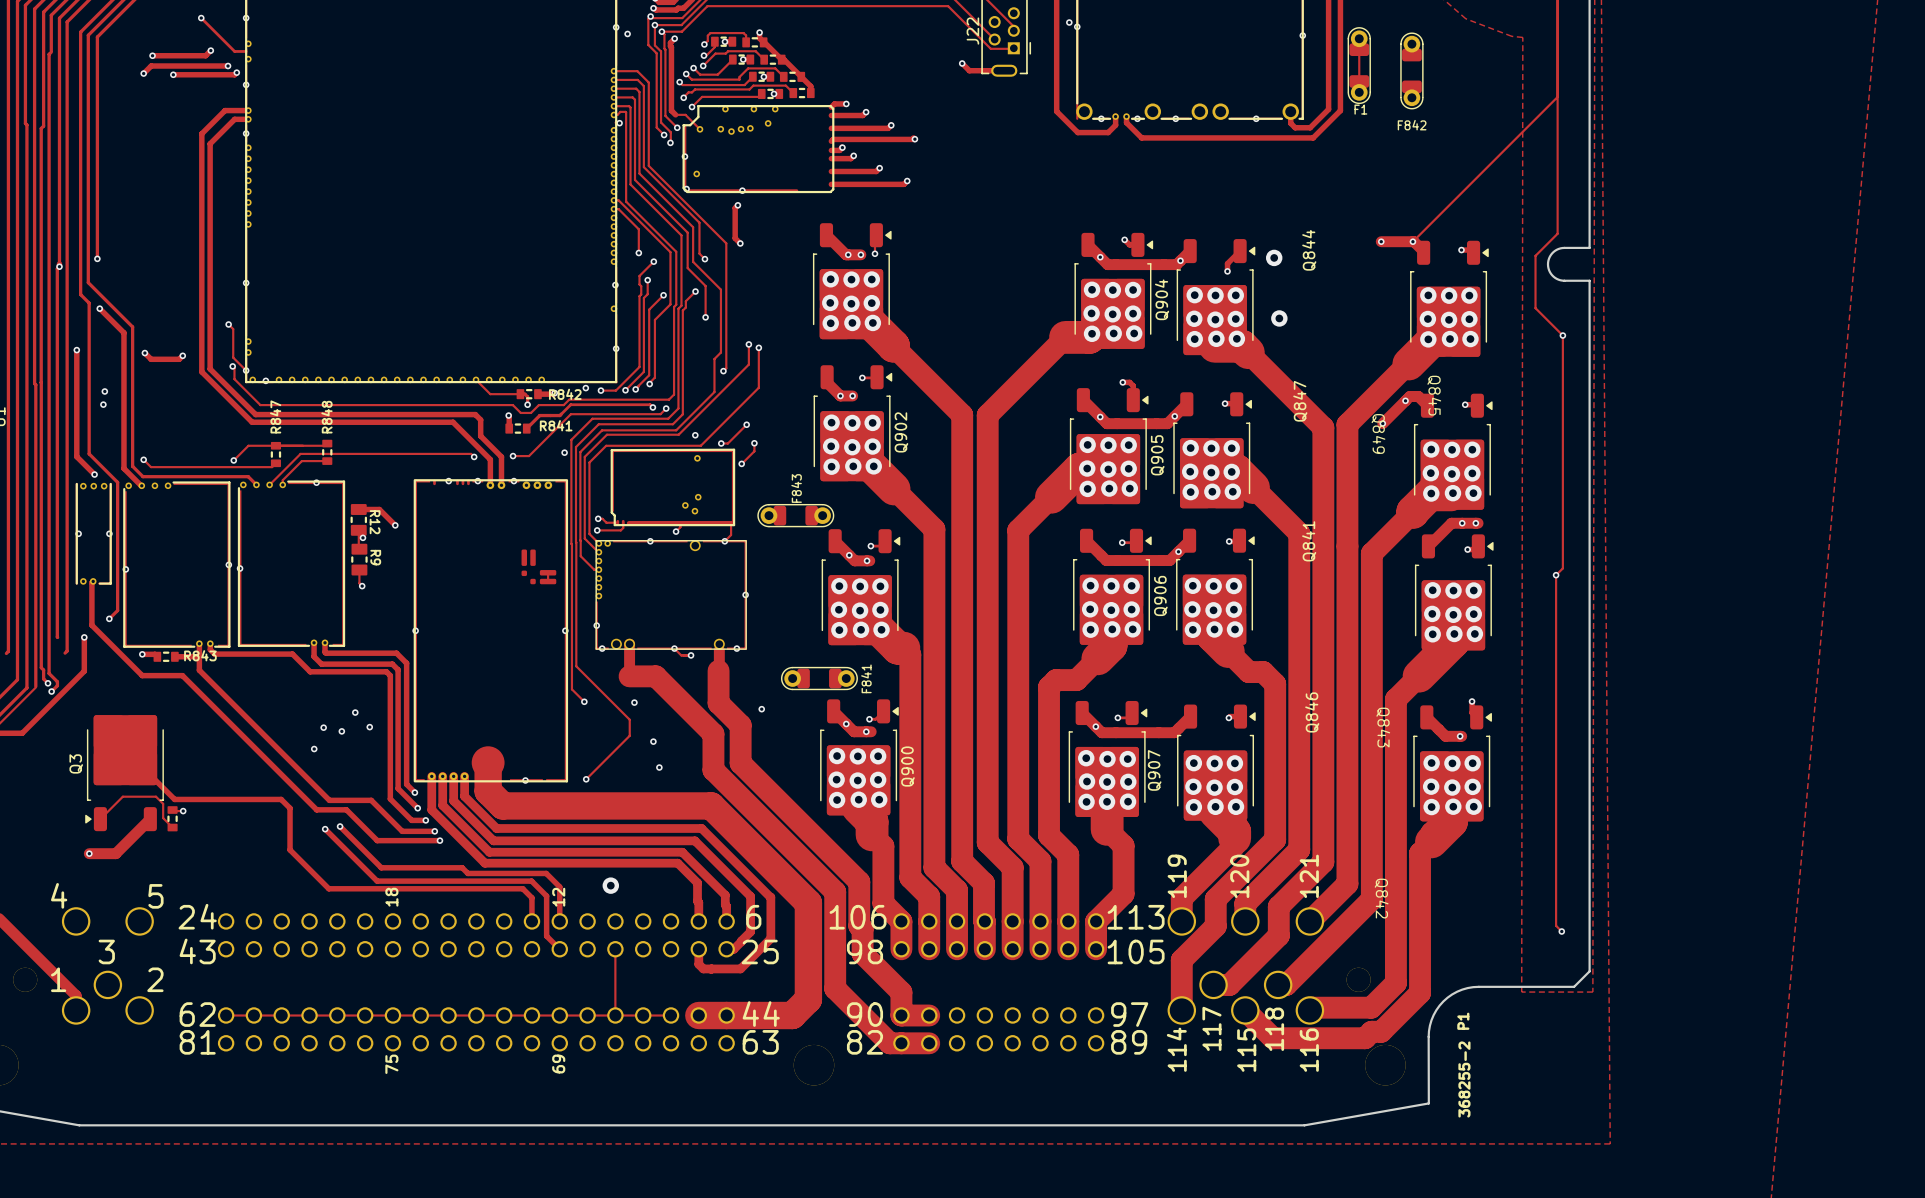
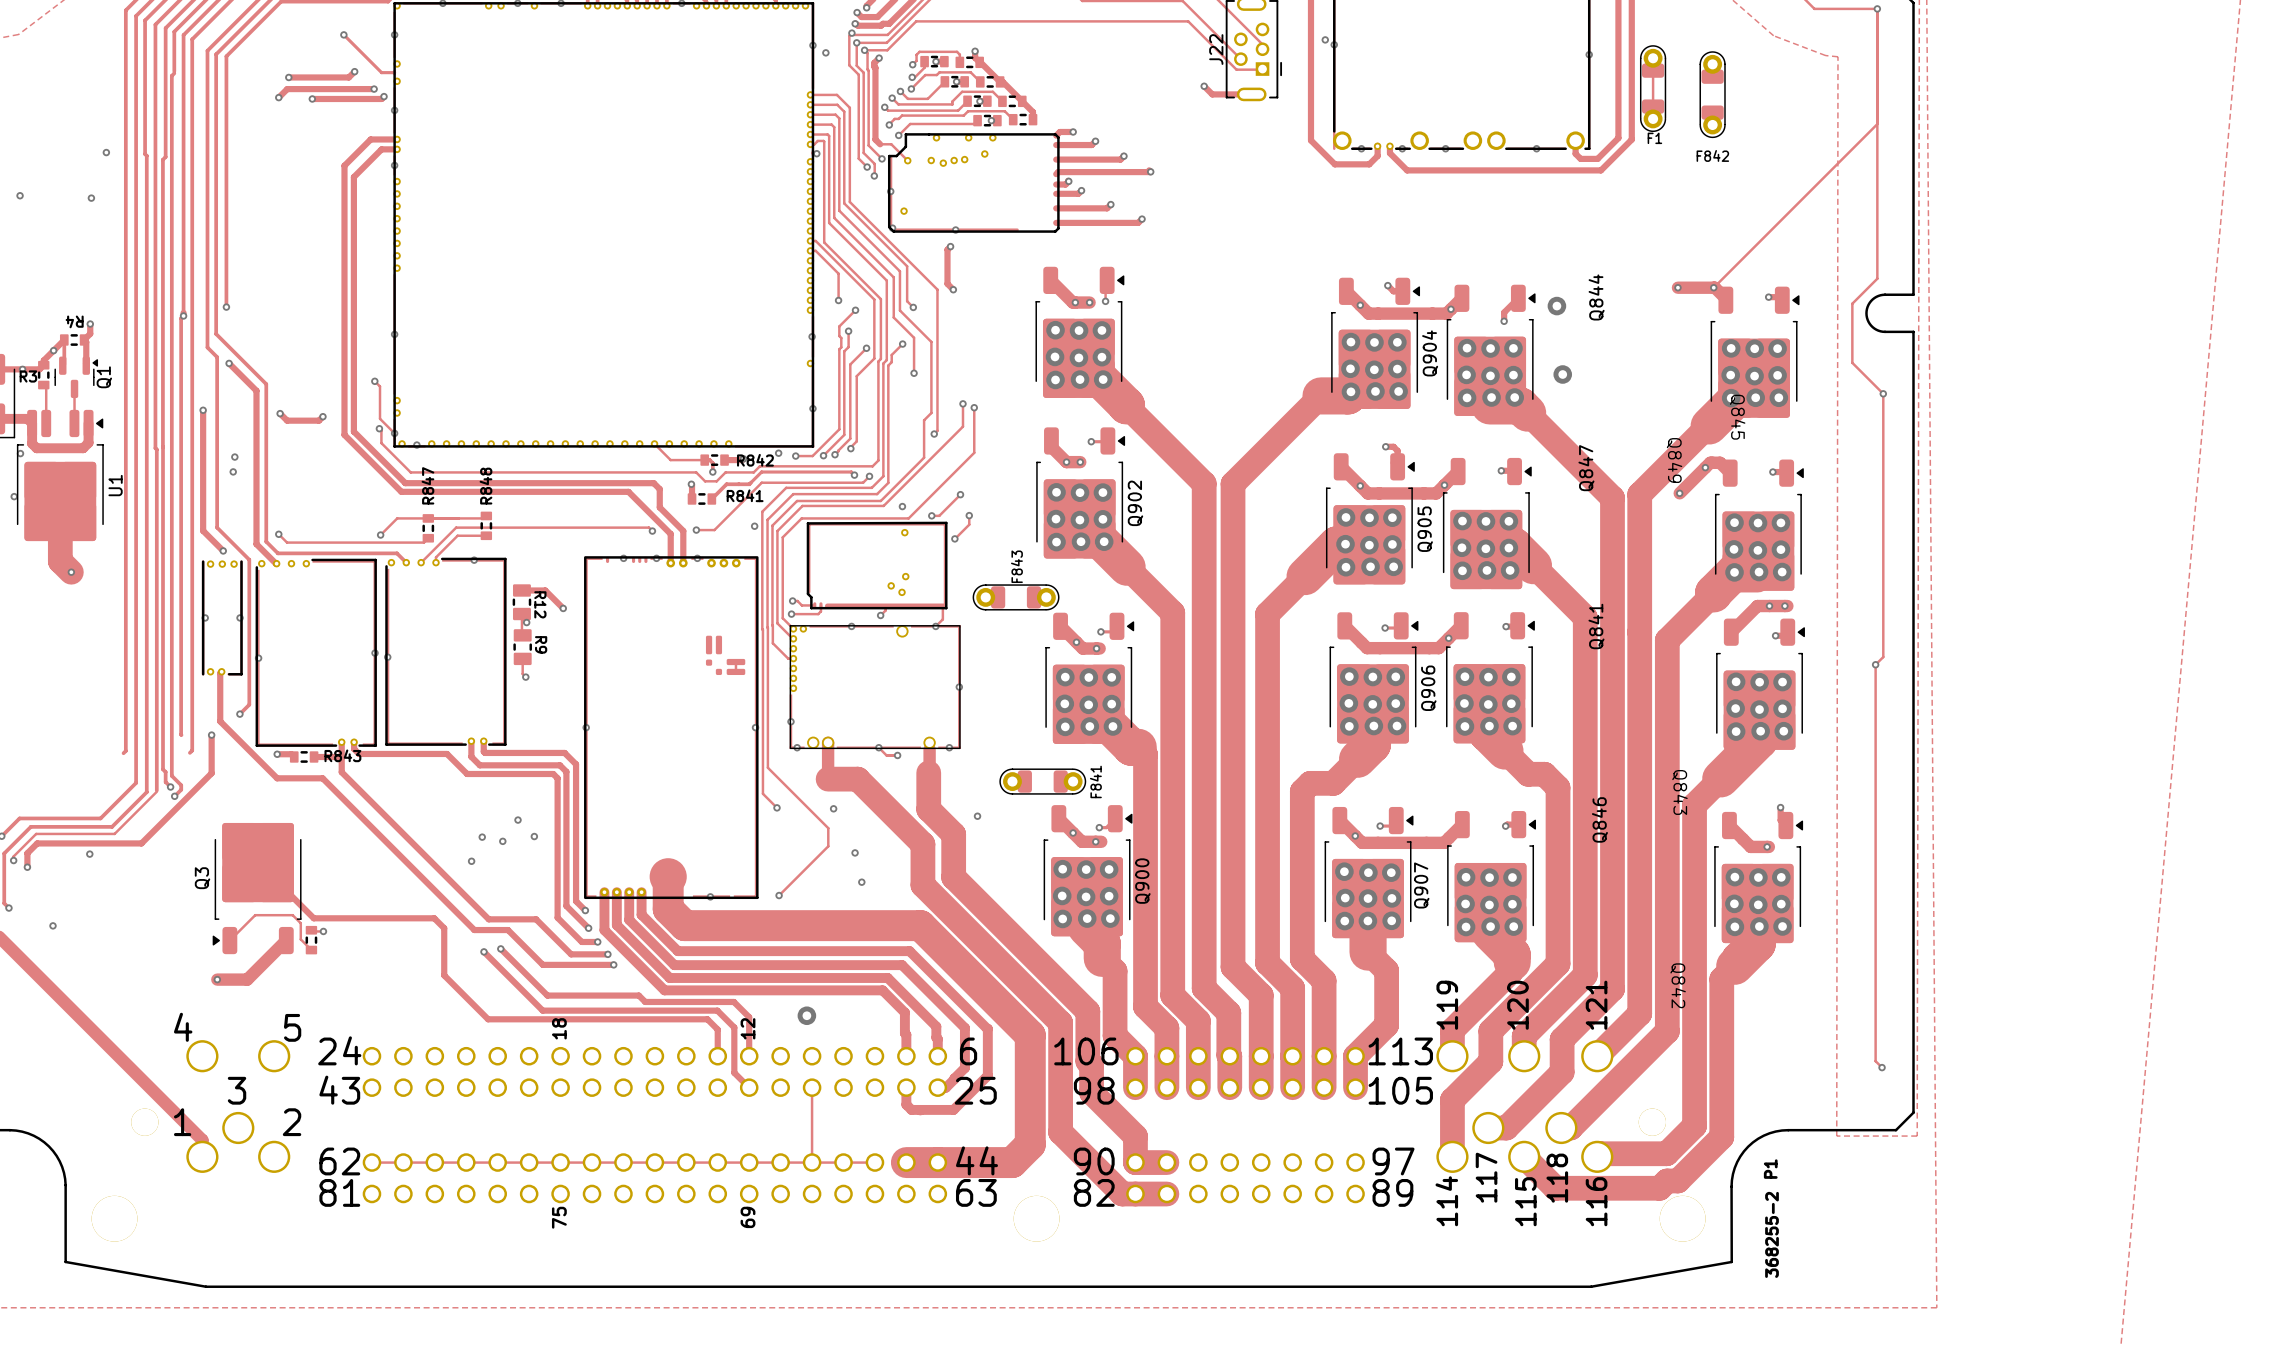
Q845 name position: Q845 (1434, 395) -> Q845 (1737, 417)
Q849 name position: Q849 (1378, 433) -> Q849 (1674, 460)
Q843 name position: Q843 (1383, 727) -> Q843 (1679, 792)
Q842 name position: Q842 (1381, 898) -> Q842 (1678, 985)

